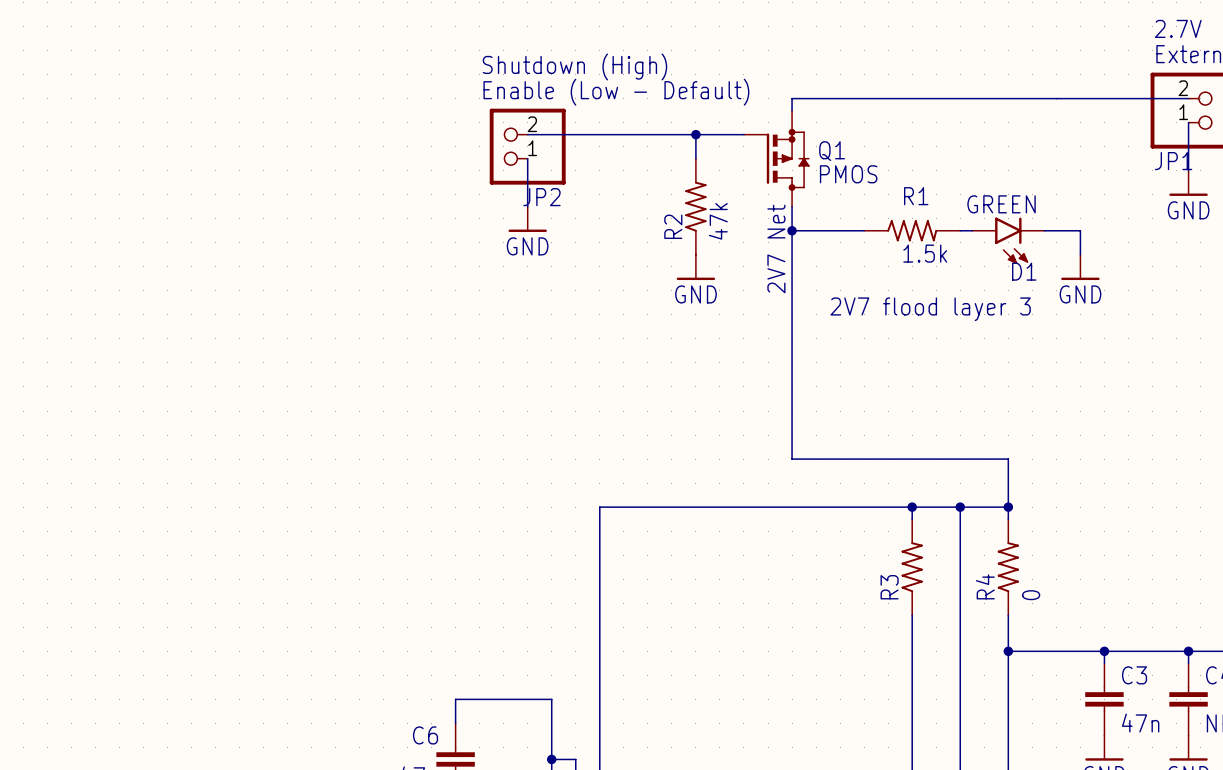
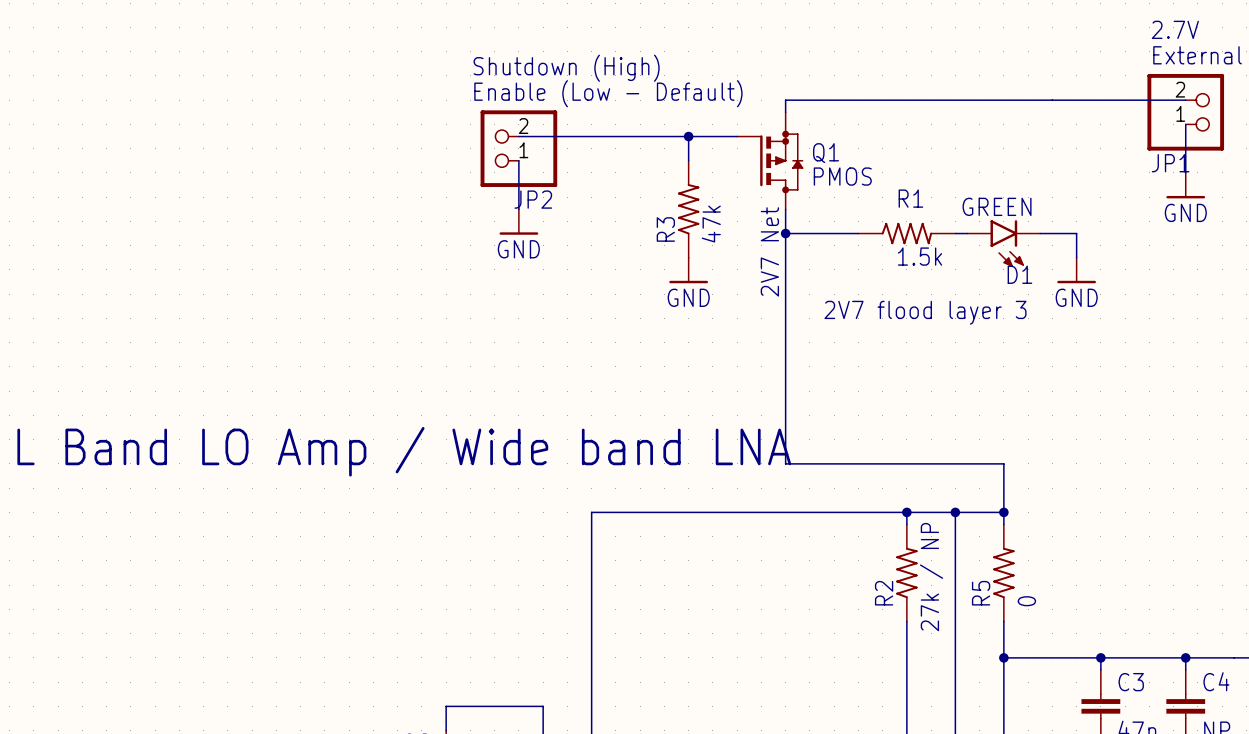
R2 name: R2 (673, 226) -> R3 (665, 229)
text: none -> L Band LO Amp / Wide band LNA (404, 451)
R3 value: none -> 27k / NP (931, 577)
R4 name: R4 (985, 586) -> R5 (981, 593)
R3 name: R3 (889, 587) -> R2 (884, 593)

